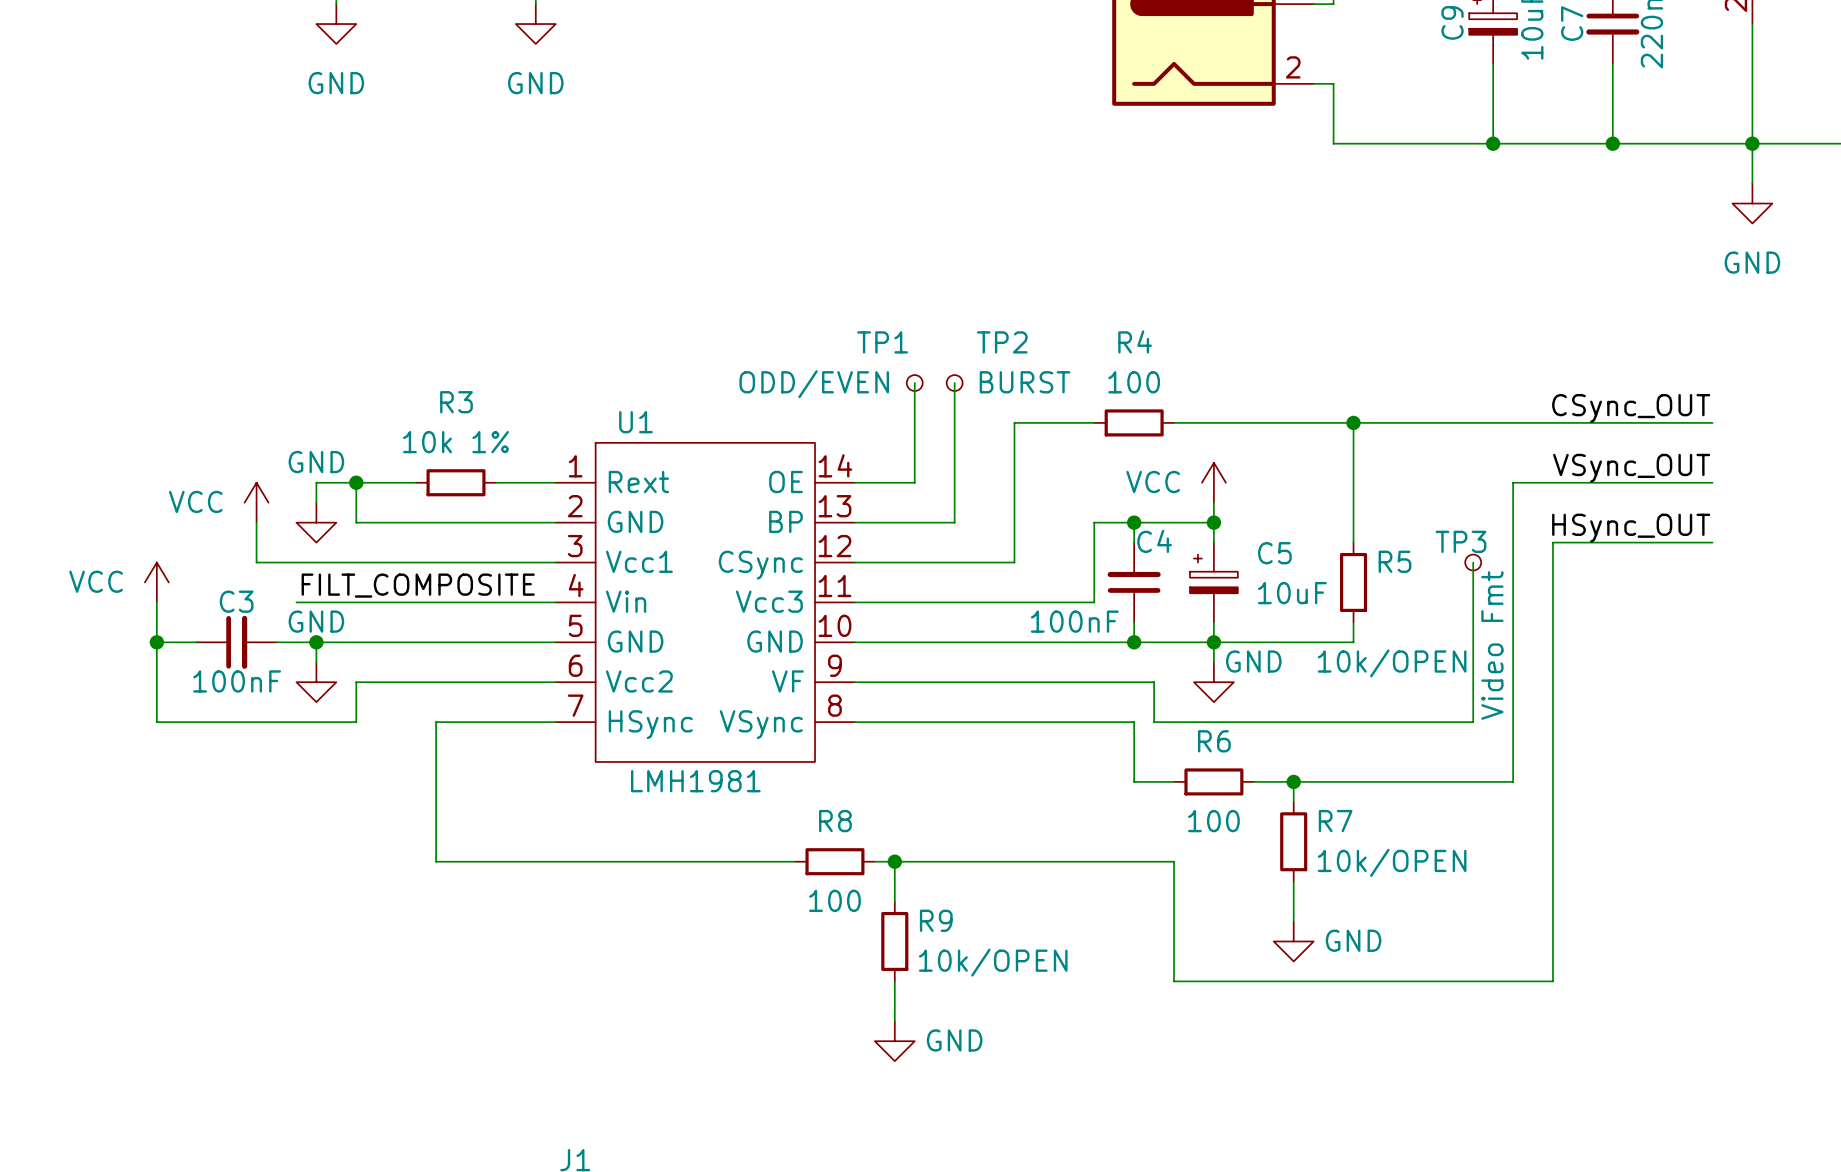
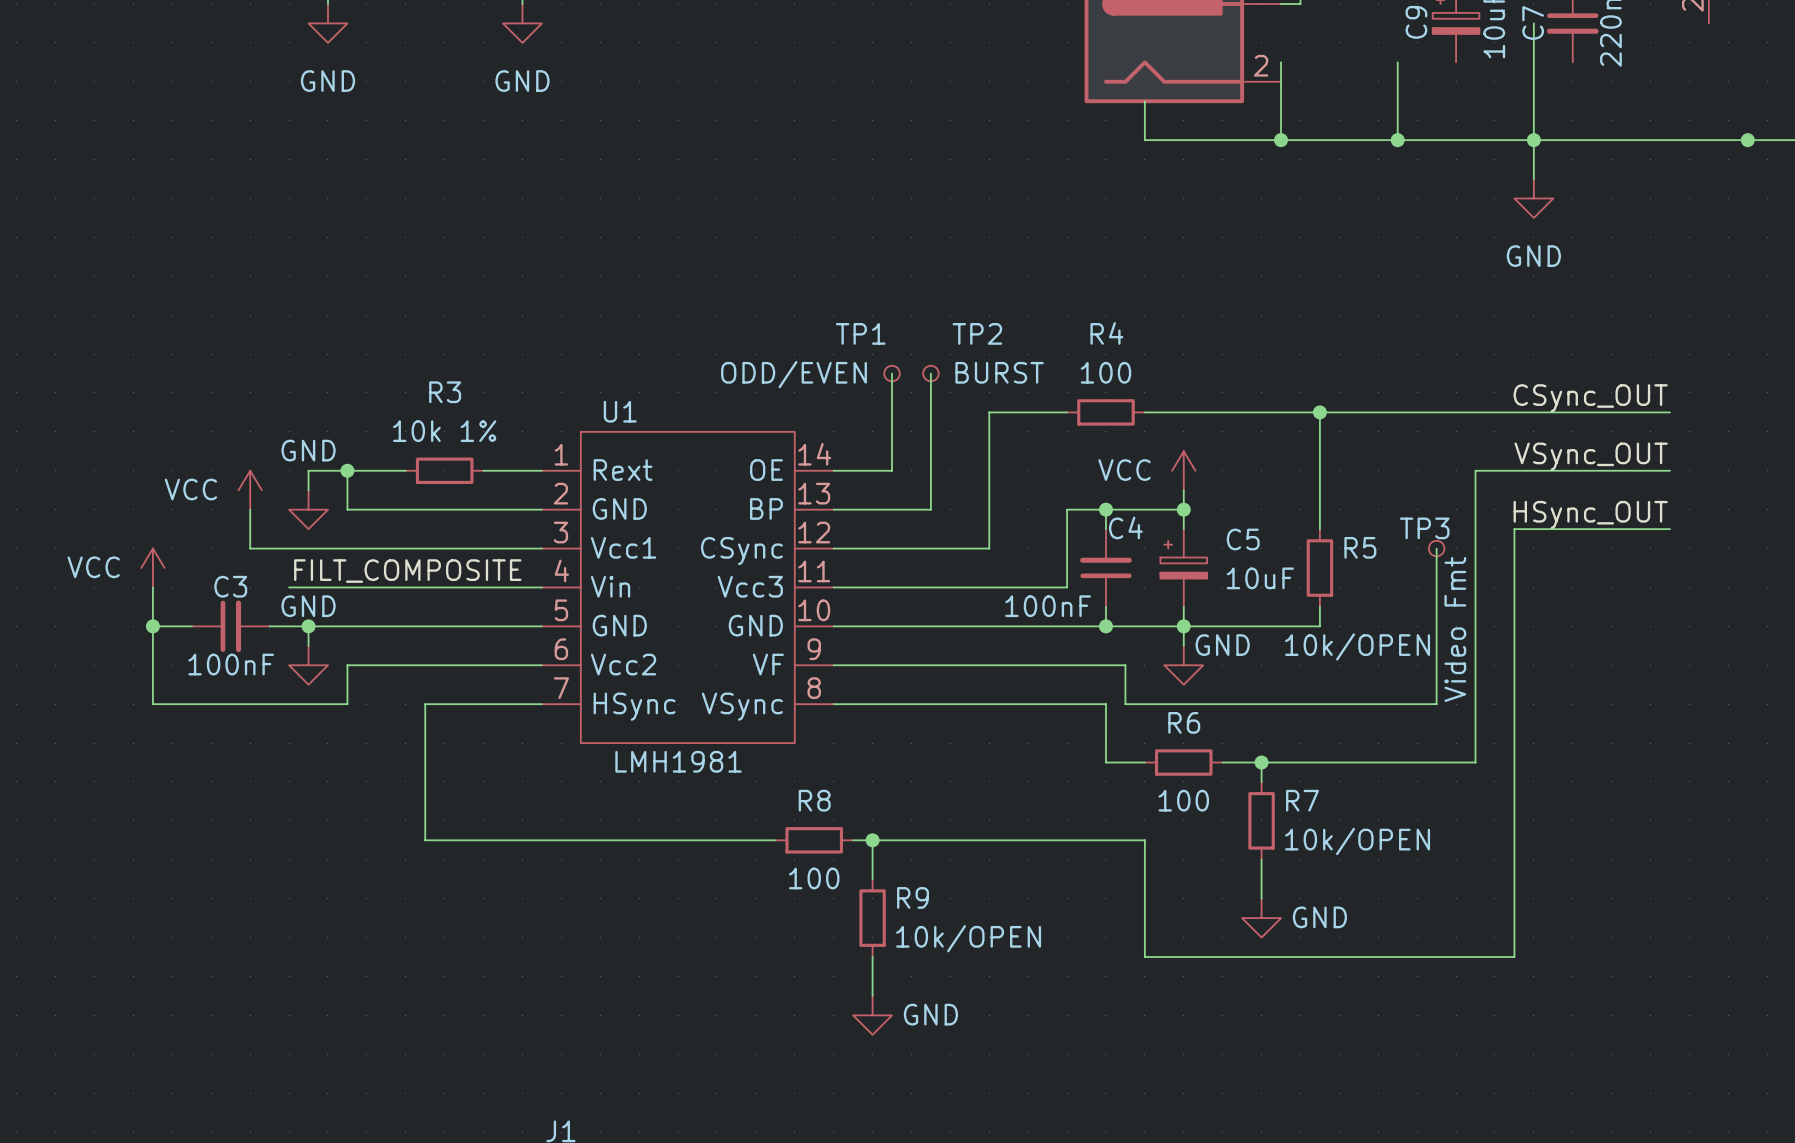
wire: (1752, 24) (1752, 183) -> (1533, 23) (1533, 179)
wire: (1493, 63) (1493, 143) -> (1281, 62) (1281, 140)
wire: (1612, 63) (1612, 143) -> (1397, 62) (1397, 140)
wire: (1313, 83) (1333, 83) (1333, 143) -> (1144, 101) (1144, 140) (1300, 140)
junction: none -> (1281, 140)
junction: none -> (1397, 140)
junction: (1493, 143) -> none
junction: none -> (1533, 140)
junction: (1612, 143) -> none
junction position: (1752, 143) -> (1747, 140)
power symbol position: GND (1752, 203) -> GND (1533, 198)

